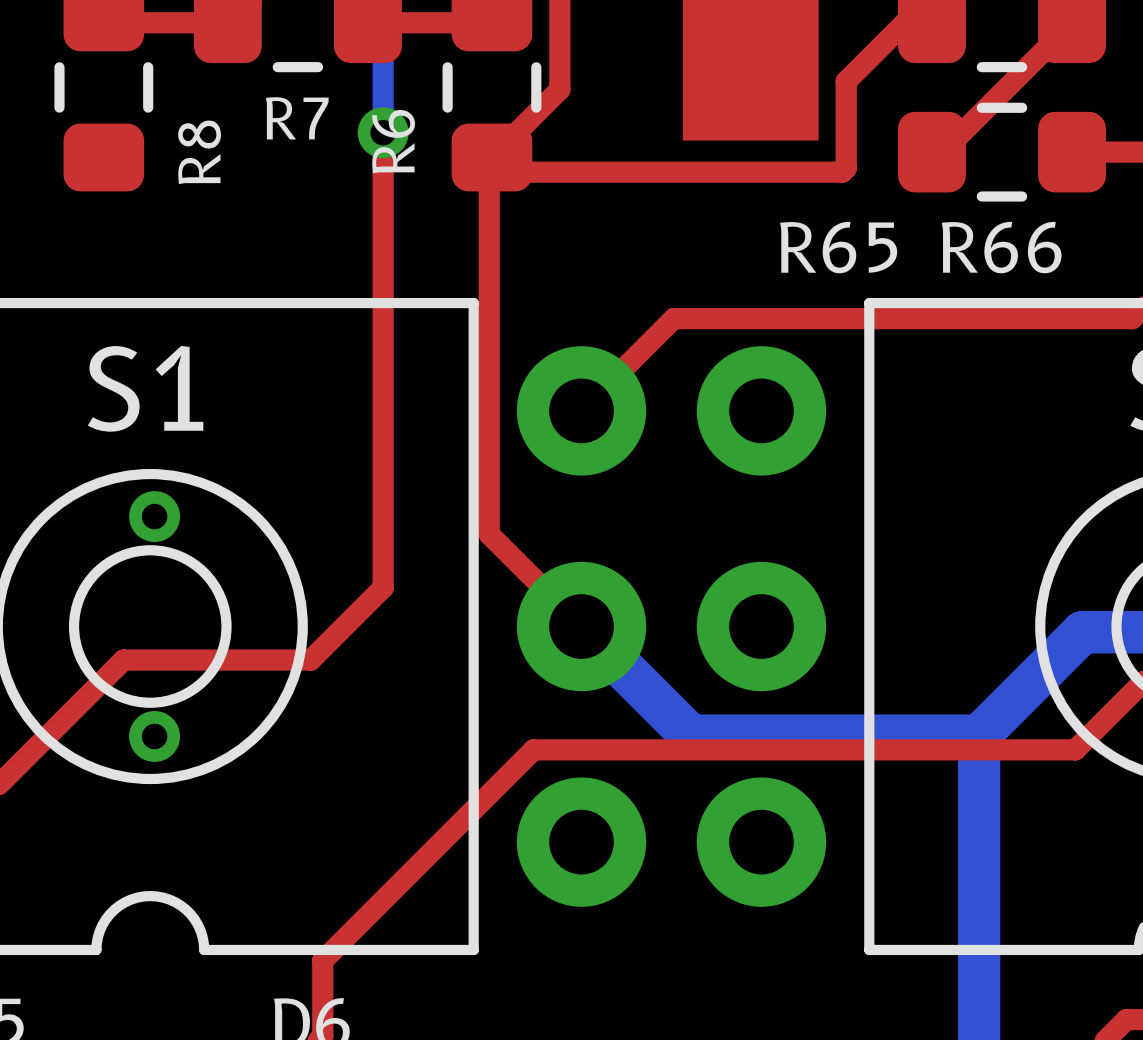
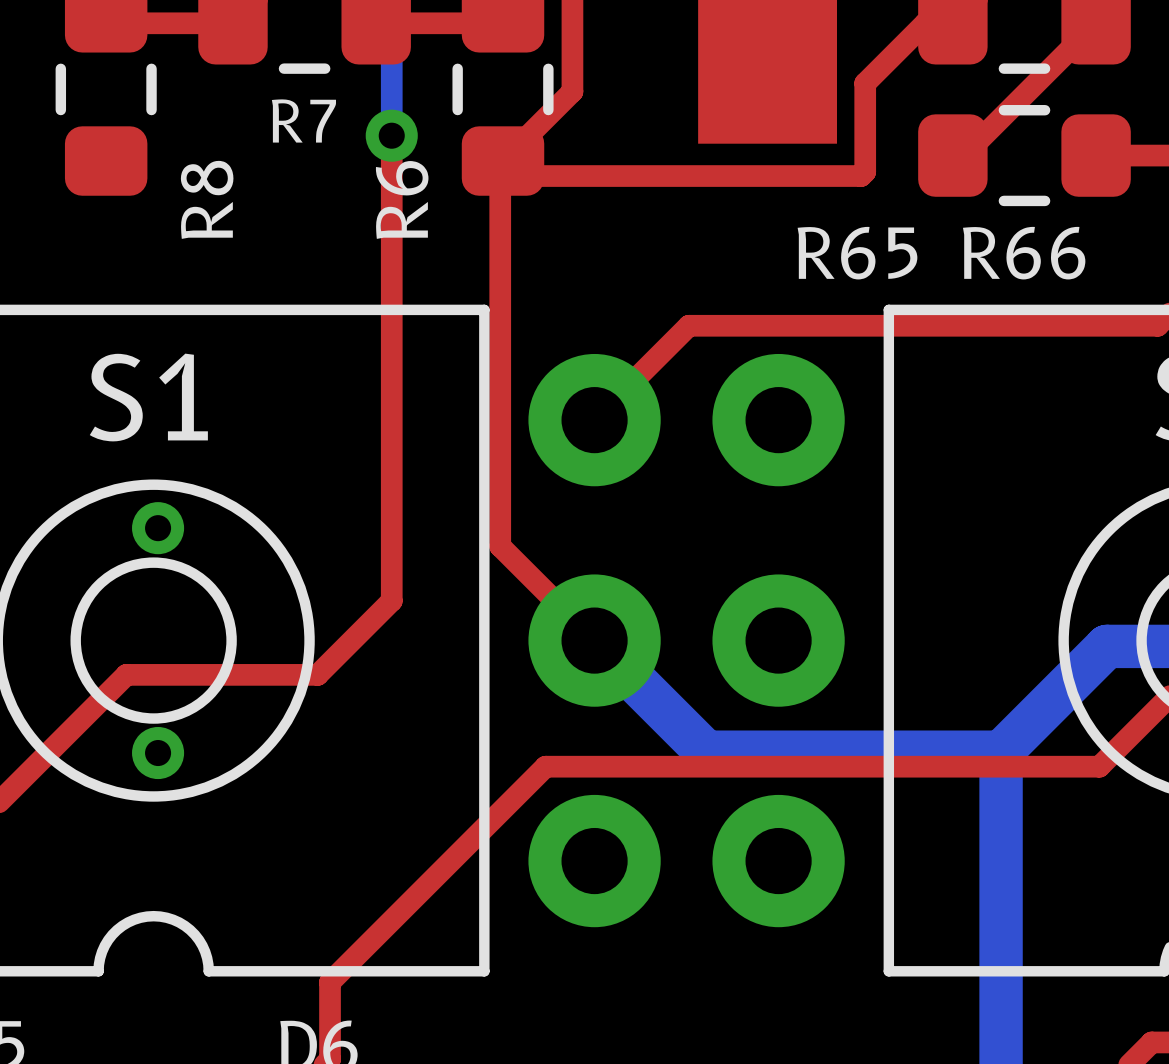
R6 name position: R6 (393, 141) -> R6 (402, 199)
R8 name position: R8 (199, 152) -> R8 (207, 199)

